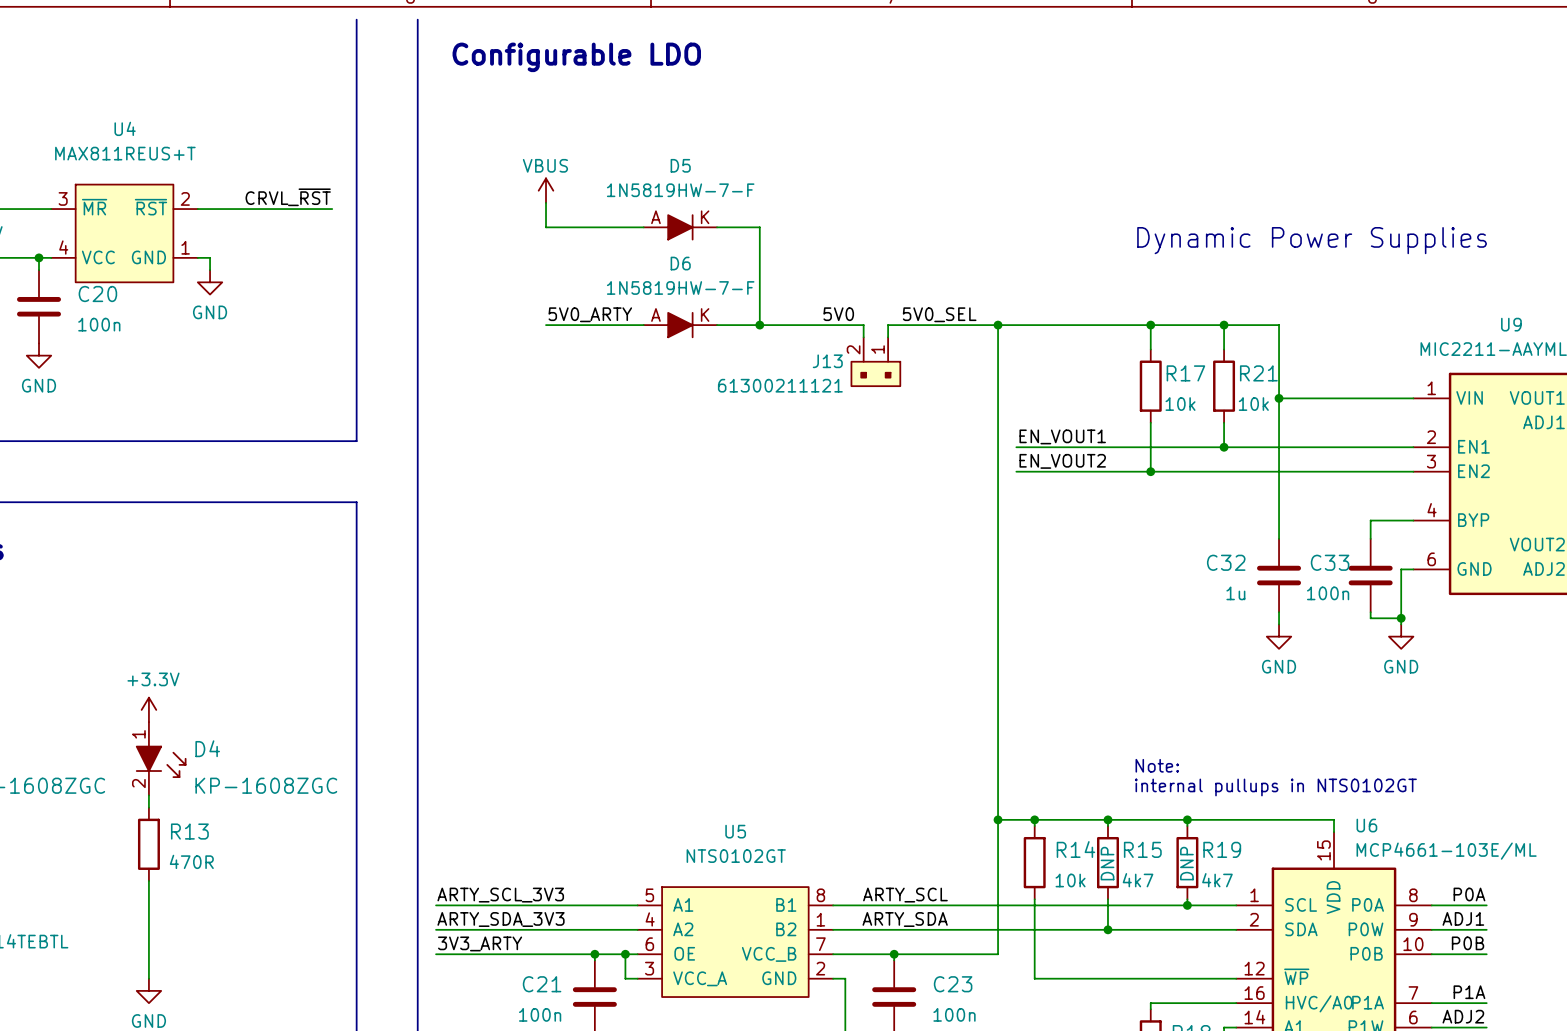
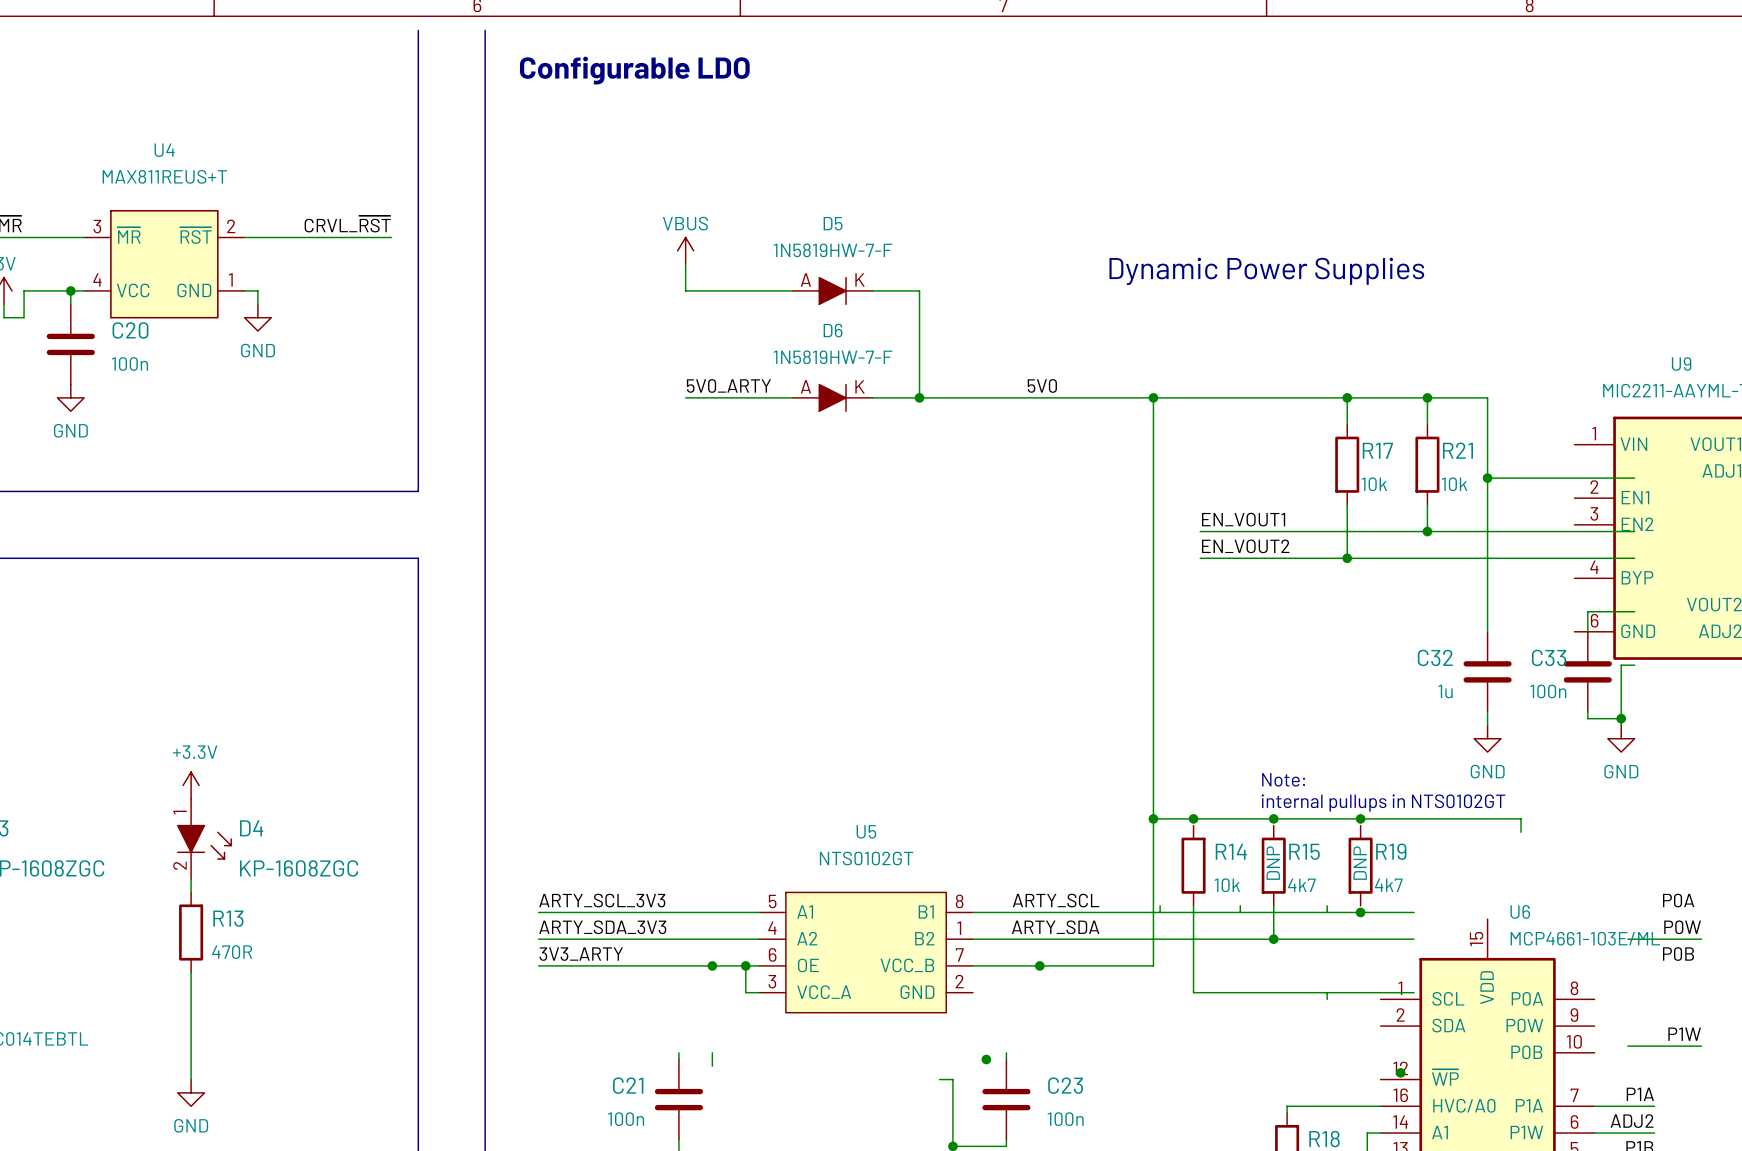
power symbol position: VBUS (546, 190) -> VBUS (685, 250)
wire: (546, 202) (546, 227) (643, 227) -> (685, 264) (685, 290) (792, 290)
D5 position: (680, 227) -> (832, 290)
wire: (717, 227) (759, 227) (759, 325) -> (872, 290) (919, 290) (919, 397)
text position: Dynamic Power Supplies (1312, 240) -> Dynamic Power Supplies (1266, 271)
label position: 5V0_ARTY (590, 314) -> 5V0_ARTY (728, 385)
label position: 5V0 (838, 314) -> 5V0 (1042, 385)
label: 5V0_SEL (939, 314) -> none
wire: (546, 325) (643, 325) -> (685, 397) (792, 397)
D6 position: (680, 325) -> (832, 397)
wire: (717, 325) (863, 325) (863, 337) -> none
junction: (759, 325) -> none
wire: (998, 325) (998, 954) (833, 954) -> none
junction position: (998, 325) -> (1153, 397)
wire: (1150, 325) (1150, 349) -> (1347, 397) (1347, 424)
junction: (1150, 325) -> none
wire: (1224, 325) (1224, 349) -> none
junction: (1224, 325) -> none
wire: (888, 337) (888, 325) (1279, 325) (1279, 355) -> none
wire: none -> (872, 397) (1487, 397) (1487, 631)
junction: none -> (919, 397)
wire: none -> (1153, 397) (1153, 965) (972, 965)
junction: none -> (1347, 397)
junction: none -> (1427, 397)
J13: 61300211121 (875, 361) -> none
wire: (1279, 380) (1279, 453) -> none
R17 position: (1150, 386) -> (1347, 464)
R21 position: (1224, 386) -> (1427, 464)
wire: (1279, 398) (1413, 398) -> (1487, 478) (1634, 478)
junction: (1279, 398) -> none
wire: (1150, 422) (1150, 471) -> (1347, 504) (1347, 558)
junction: none -> (1487, 478)
label position: EN_VOUT1 (1062, 436) -> EN_VOUT1 (1243, 519)
wire: (1016, 447) (1413, 447) -> (1200, 531) (1634, 531)
junction: (1224, 447) -> none
label position: EN_VOUT2 (1062, 461) -> EN_VOUT2 (1245, 546)
wire: (1016, 471) (1413, 471) -> (1200, 558) (1634, 558)
junction: (1150, 471) -> none
wire: (1279, 477) (1279, 538) -> none
junction: none -> (1427, 531)
junction: none -> (1347, 558)
wire: (1413, 520) (1370, 520) (1370, 538) -> (1634, 611) (1587, 611) (1587, 631)
wire: (1413, 569) (1401, 569) (1401, 624) -> (1634, 665) (1621, 665) (1621, 725)
C32 position: (1279, 575) -> (1487, 671)
C33 position: (1370, 575) -> (1587, 671)
wire: (1279, 612) (1279, 624) -> (1487, 711) (1487, 725)
wire: (1370, 612) (1370, 618) (1401, 618) -> (1587, 711) (1587, 718) (1621, 718)
junction: (1401, 618) -> none
power symbol: GND (1279, 636) -> none
power symbol: GND (1401, 636) -> none
junction: none -> (1621, 718)
power symbol: none -> GND (1487, 738)
power symbol: none -> GND (1621, 738)
junction: none -> (1153, 818)
junction: none -> (1193, 818)
junction: none -> (1273, 818)
junction: none -> (1360, 818)
text position: Note: (1157, 765) -> Note: (1283, 779)
text position: internal pullups in NTS0102GT (1275, 787) -> internal pullups in NTS0102GT (1383, 803)
wire: (998, 819) (1334, 819) (1334, 832) -> (1153, 818) (1520, 818) (1520, 832)
junction: (998, 819) -> none
junction: (1034, 819) -> none
junction: (1107, 819) -> none
junction: (1187, 819) -> none
junction: none -> (1360, 912)
label: none -> P0W (1682, 927)
junction: none -> (1273, 939)
wire: none -> (1627, 939) (1701, 939)
R14 position: (1034, 862) -> (1193, 865)
R15 position: (1107, 862) -> (1273, 865)
R19 position: (1187, 862) -> (1360, 865)
junction: none -> (712, 965)
wire: none -> (745, 965) (745, 992) (759, 992)
junction: none -> (745, 965)
junction: none -> (1039, 965)
label position: P0A (1469, 894) -> P0A (1678, 900)
label position: ARTY_SCL_3V3 (500, 895) -> ARTY_SCL_3V3 (602, 900)
label position: ARTY_SCL (905, 895) -> ARTY_SCL (1056, 900)
wire: (1034, 899) (1034, 978) (1236, 978) -> (1193, 905) (1193, 992) (1414, 992)
wire: (1107, 899) (1107, 929) -> (1273, 905) (1273, 939)
wire: (436, 905) (637, 905) -> (538, 912) (759, 912)
wire: (833, 905) (1236, 905) -> (972, 912) (1414, 912)
junction: (1187, 905) -> none
wire: (1431, 905) (1486, 905) -> none
label: ADJ1 (1463, 918) -> none
label position: ARTY_SDA_3V3 (501, 919) -> ARTY_SDA_3V3 (602, 927)
label position: ARTY_SDA (905, 919) -> ARTY_SDA (1055, 927)
wire: (436, 929) (637, 929) -> (538, 939) (759, 939)
wire: (833, 929) (1236, 929) -> (972, 939) (1414, 939)
junction: (1107, 929) -> none
wire: (1431, 929) (1486, 929) -> none
label: none -> P1W (1684, 1034)
U5 position: (735, 942) -> (866, 952)
label position: 3V3_ARTY (480, 943) -> 3V3_ARTY (581, 954)
label position: P0B (1468, 943) -> P0B (1678, 954)
wire: none -> (1627, 1046) (1701, 1046)
wire: (436, 954) (637, 954) -> (538, 965) (759, 965)
junction: (594, 954) -> none
junction: (625, 954) -> none
junction position: (894, 954) -> (986, 1059)
wire: (1431, 954) (1486, 954) -> none
wire: (625, 966) (625, 978) (637, 978) -> none
junction: none -> (1400, 1072)

